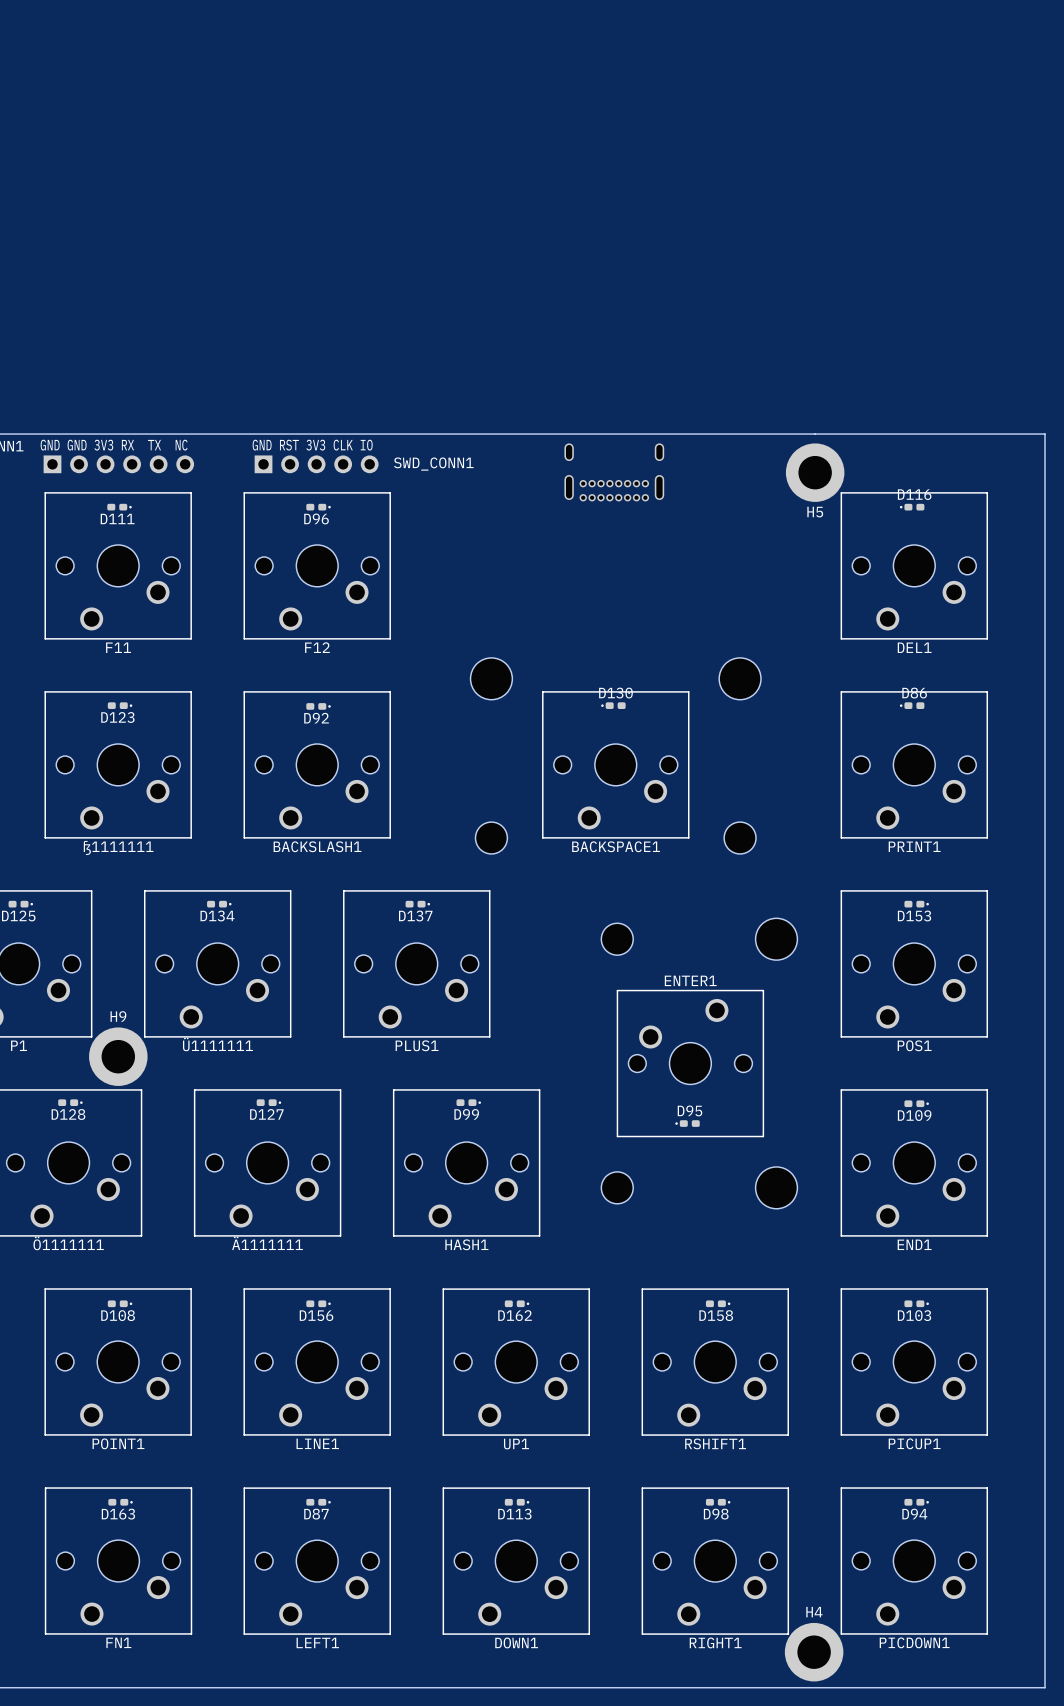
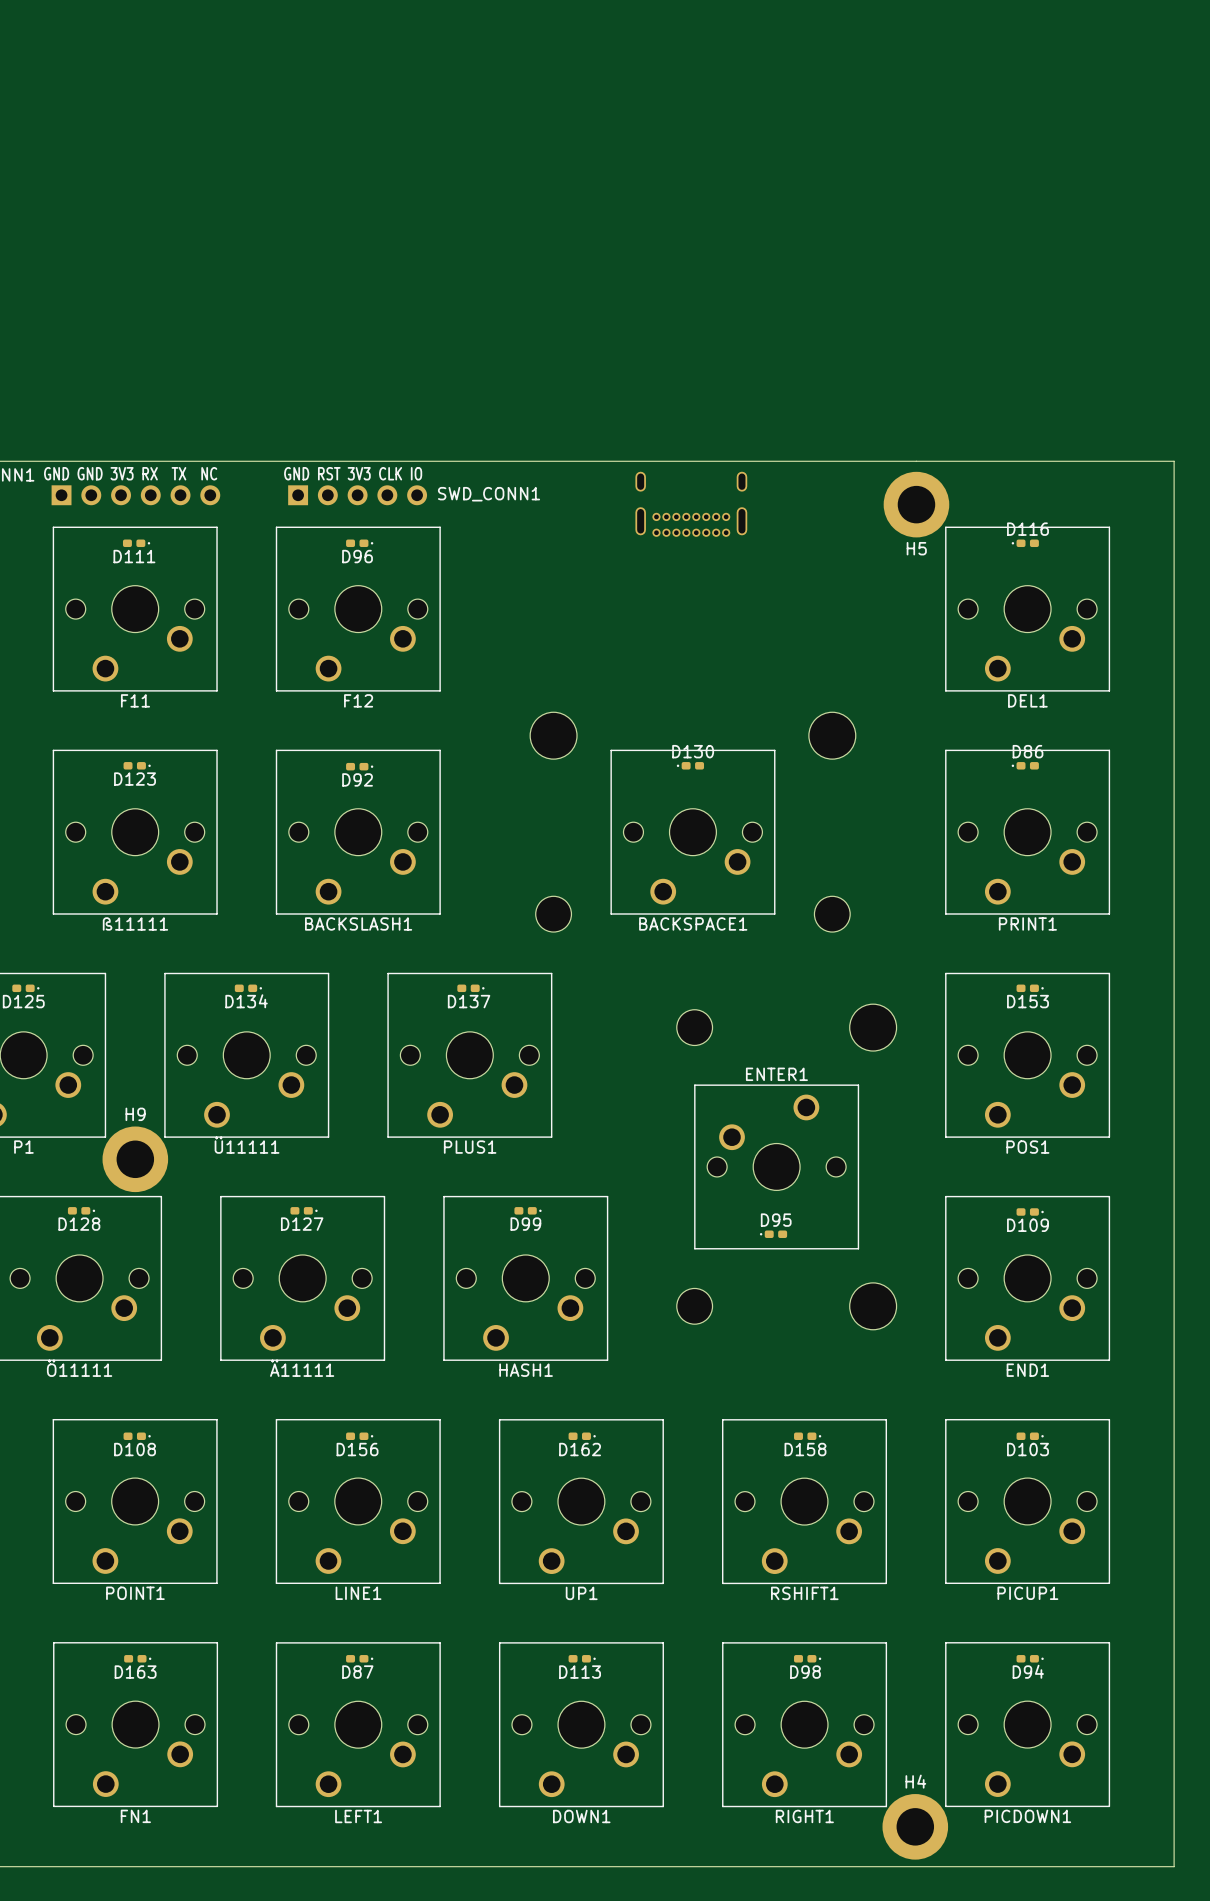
ß1111111 name: ß1111111 (118, 847) -> ß11111 (135, 923)
Ü1111111 name: Ü1111111 (217, 1044) -> Ü11111 (247, 1145)
Ö1111111 name: Ö1111111 (68, 1243) -> Ö11111 (79, 1368)
Ä1111111 name: Ä1111111 (267, 1243) -> Ä11111 (302, 1368)

